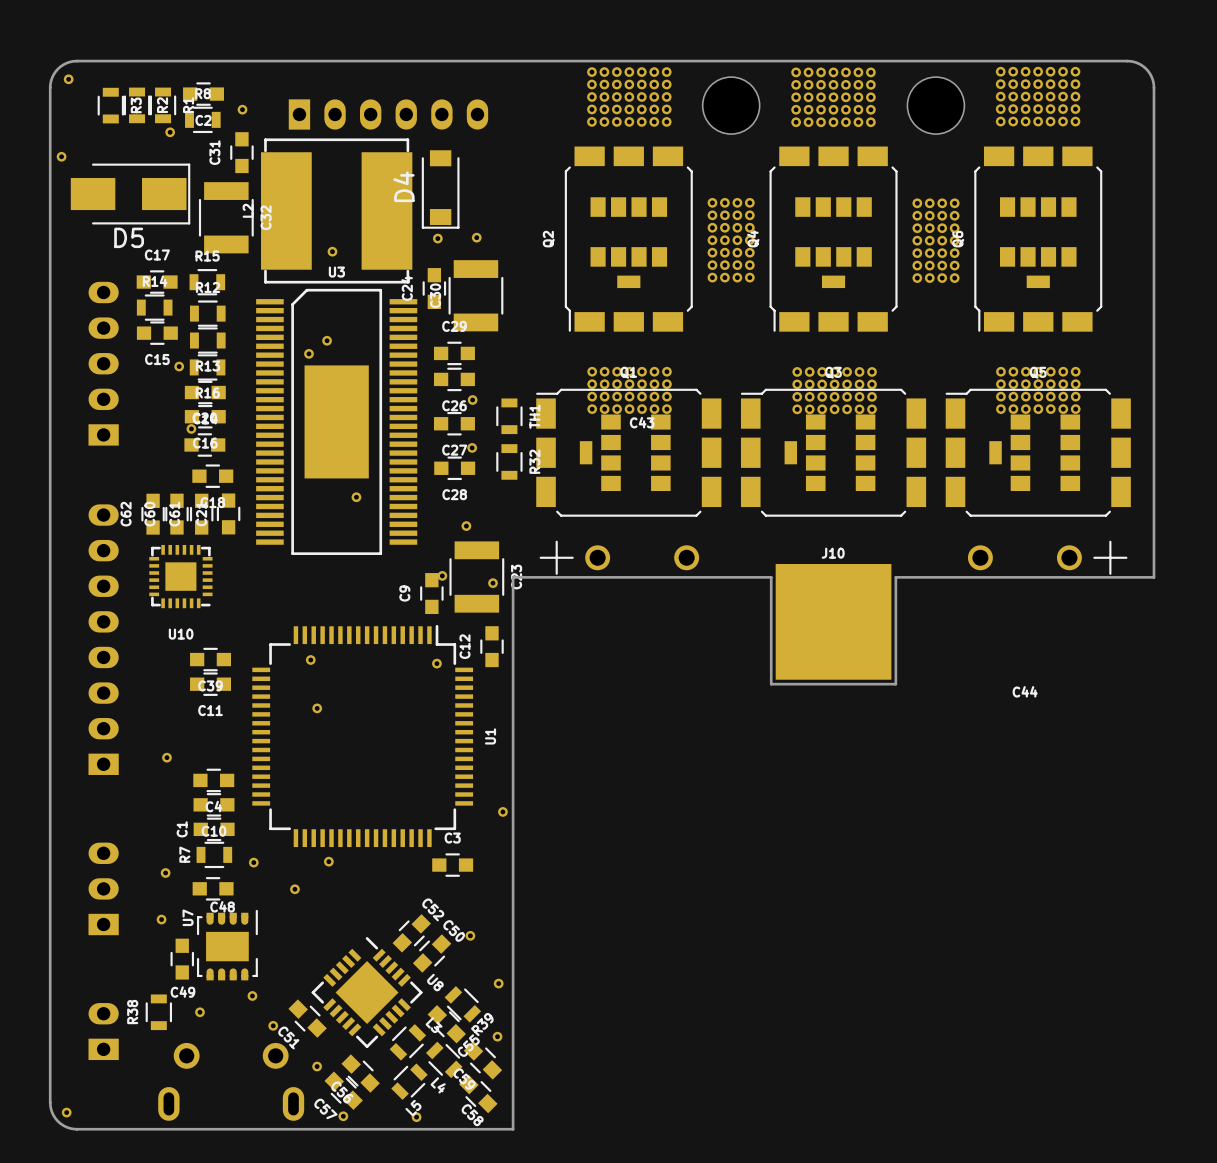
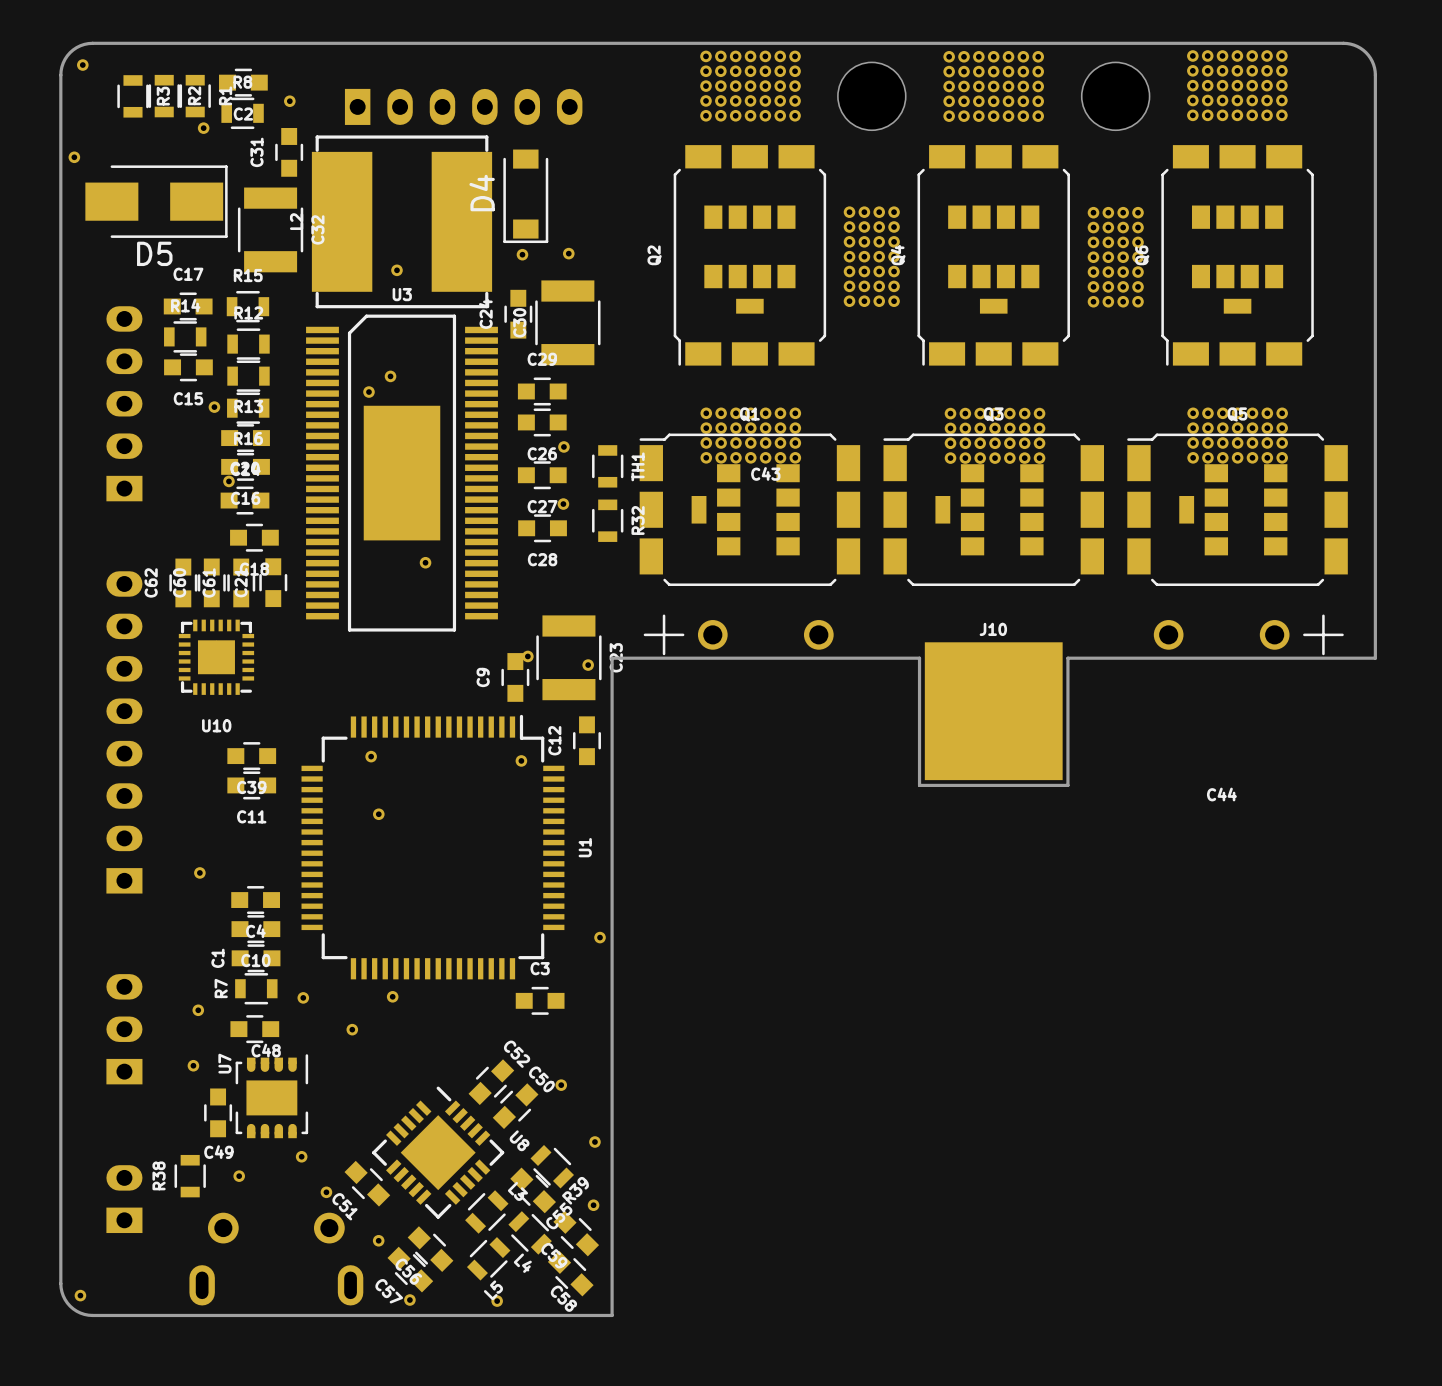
part: (466, 526) -> none

